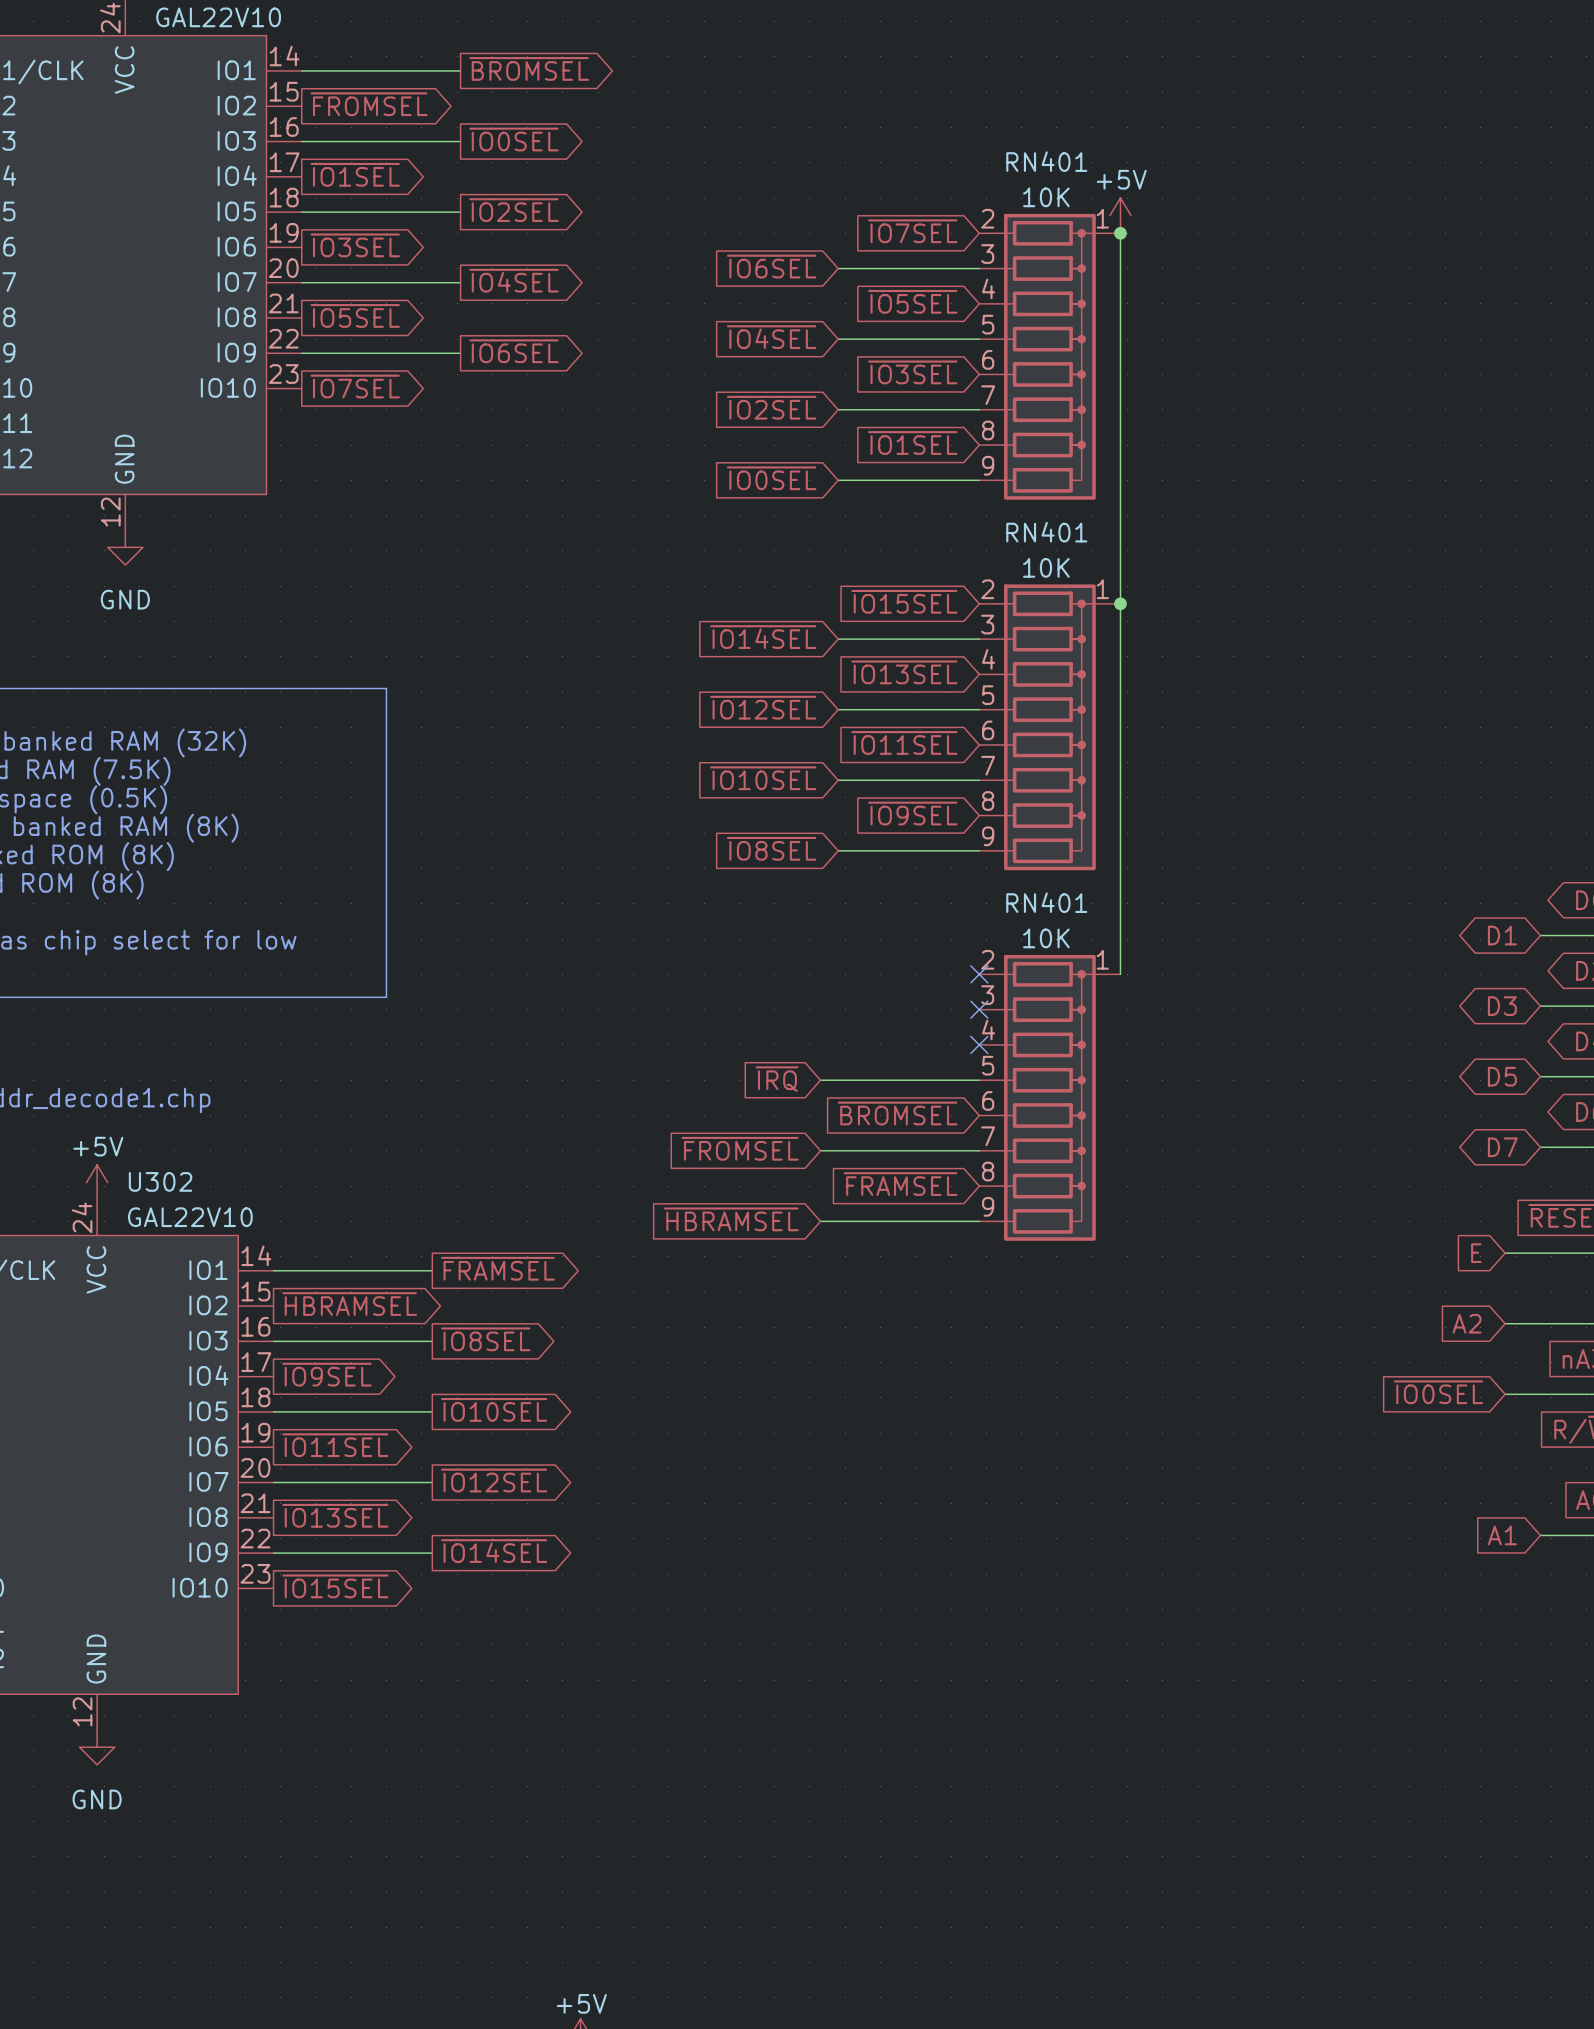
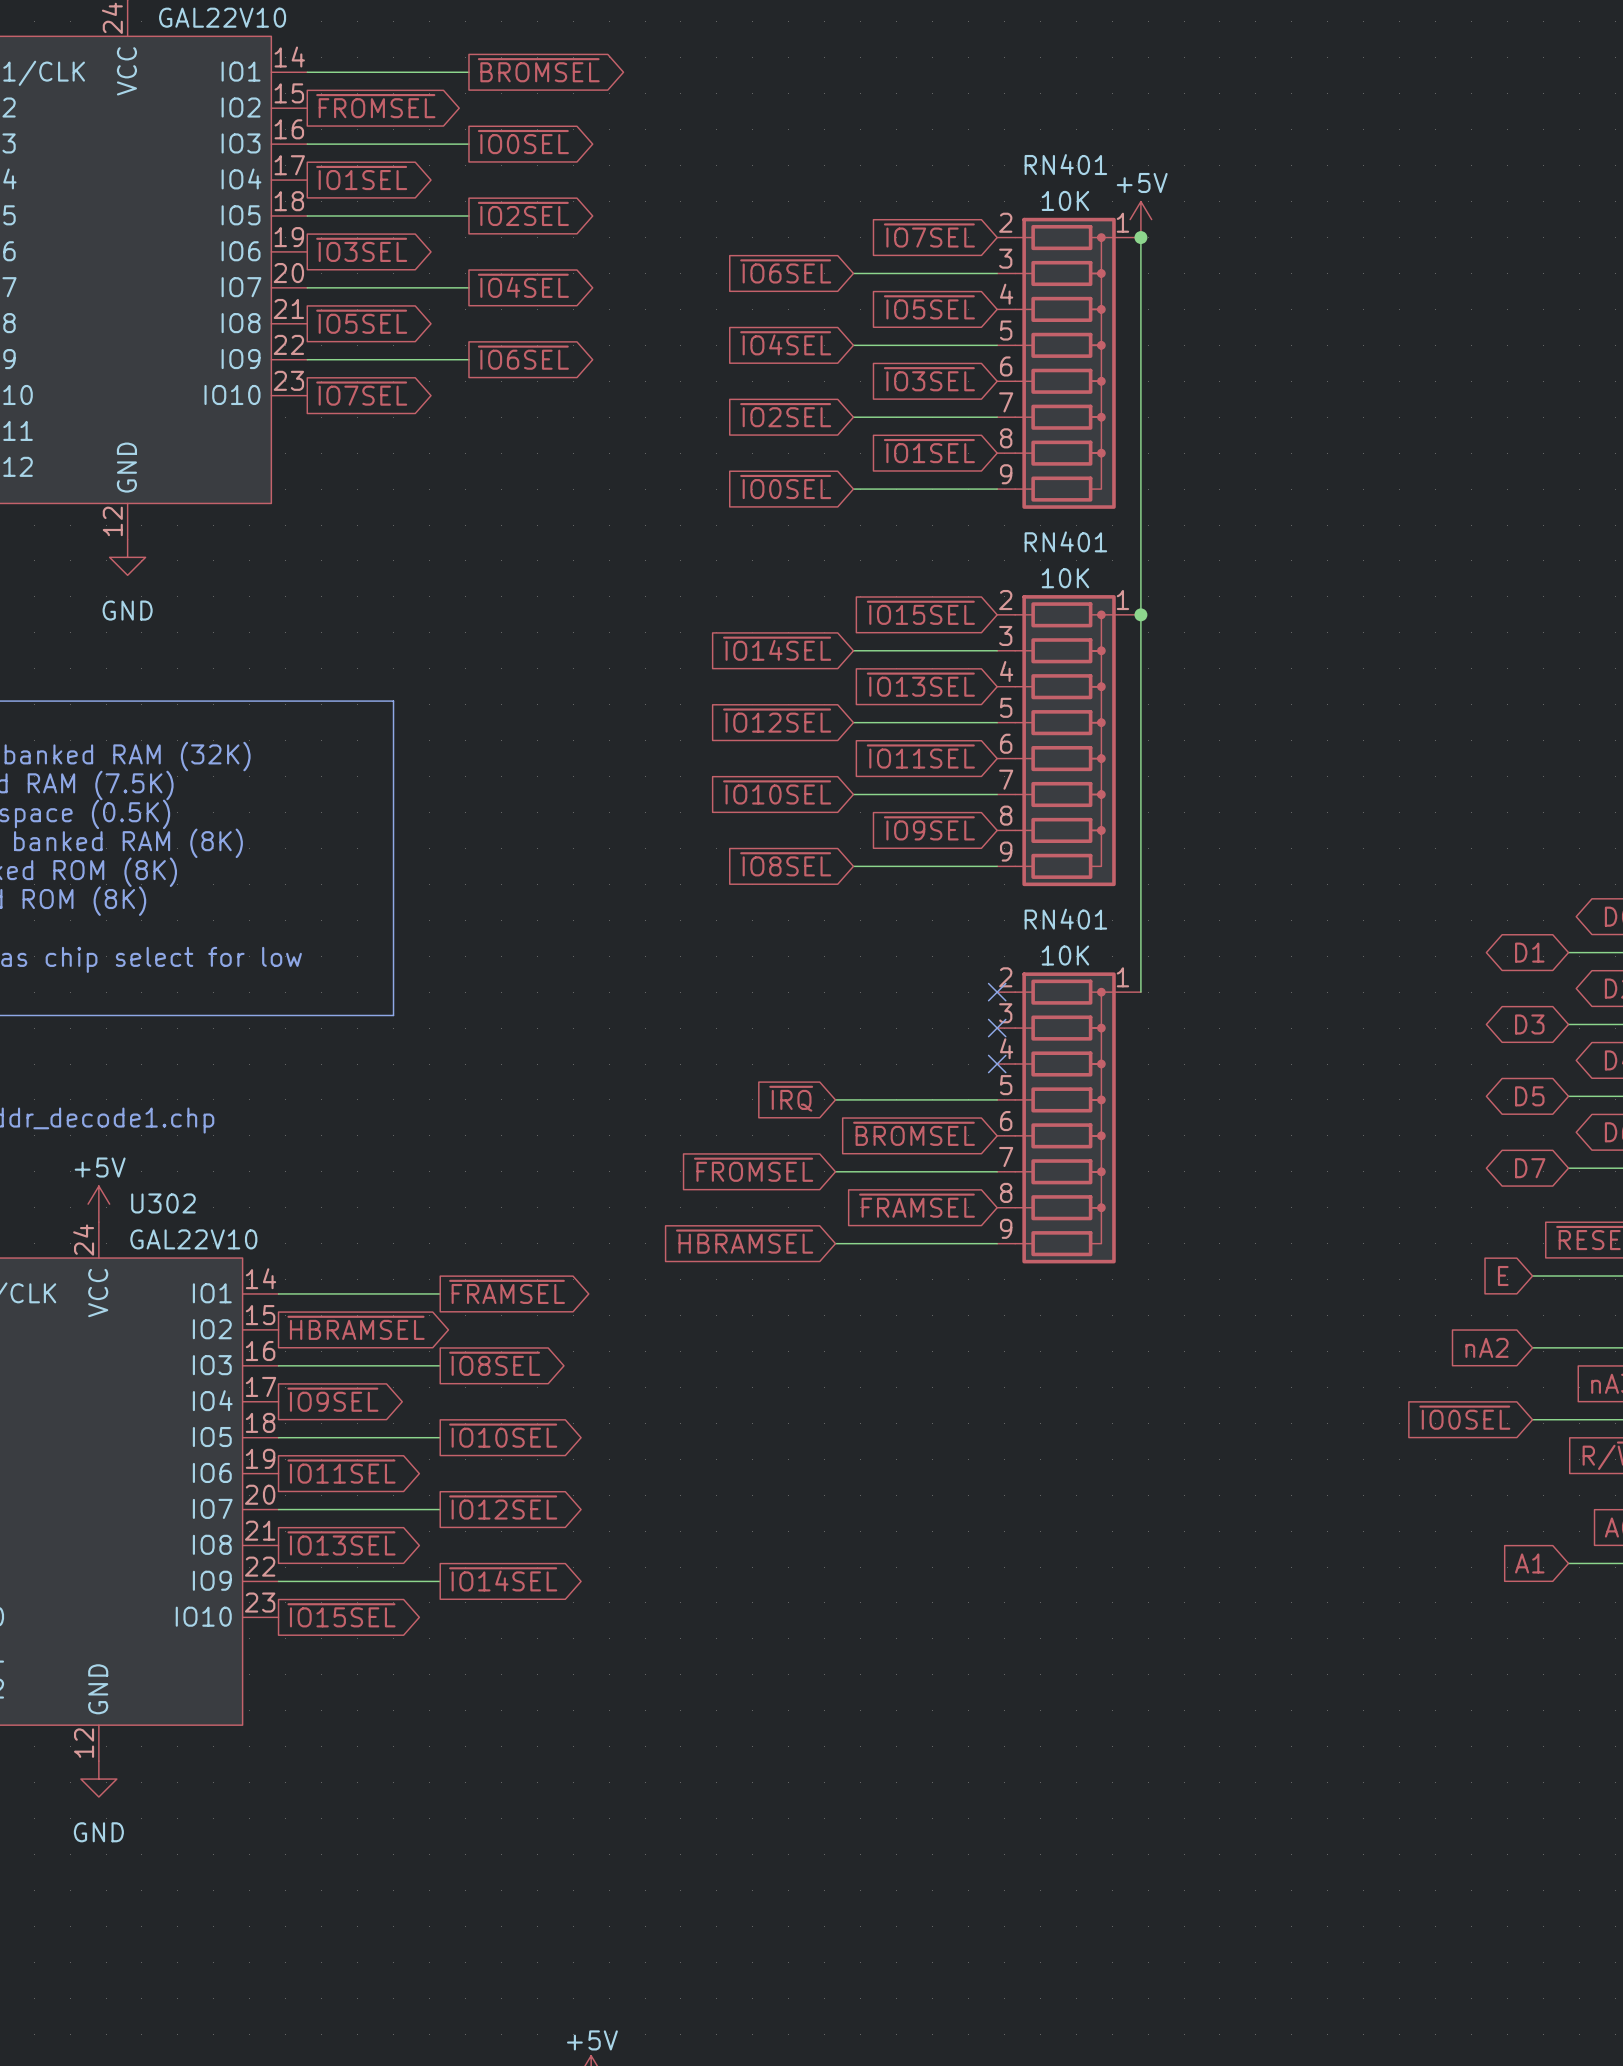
global label: A2 (1467, 1323) -> nA2 (1487, 1347)

